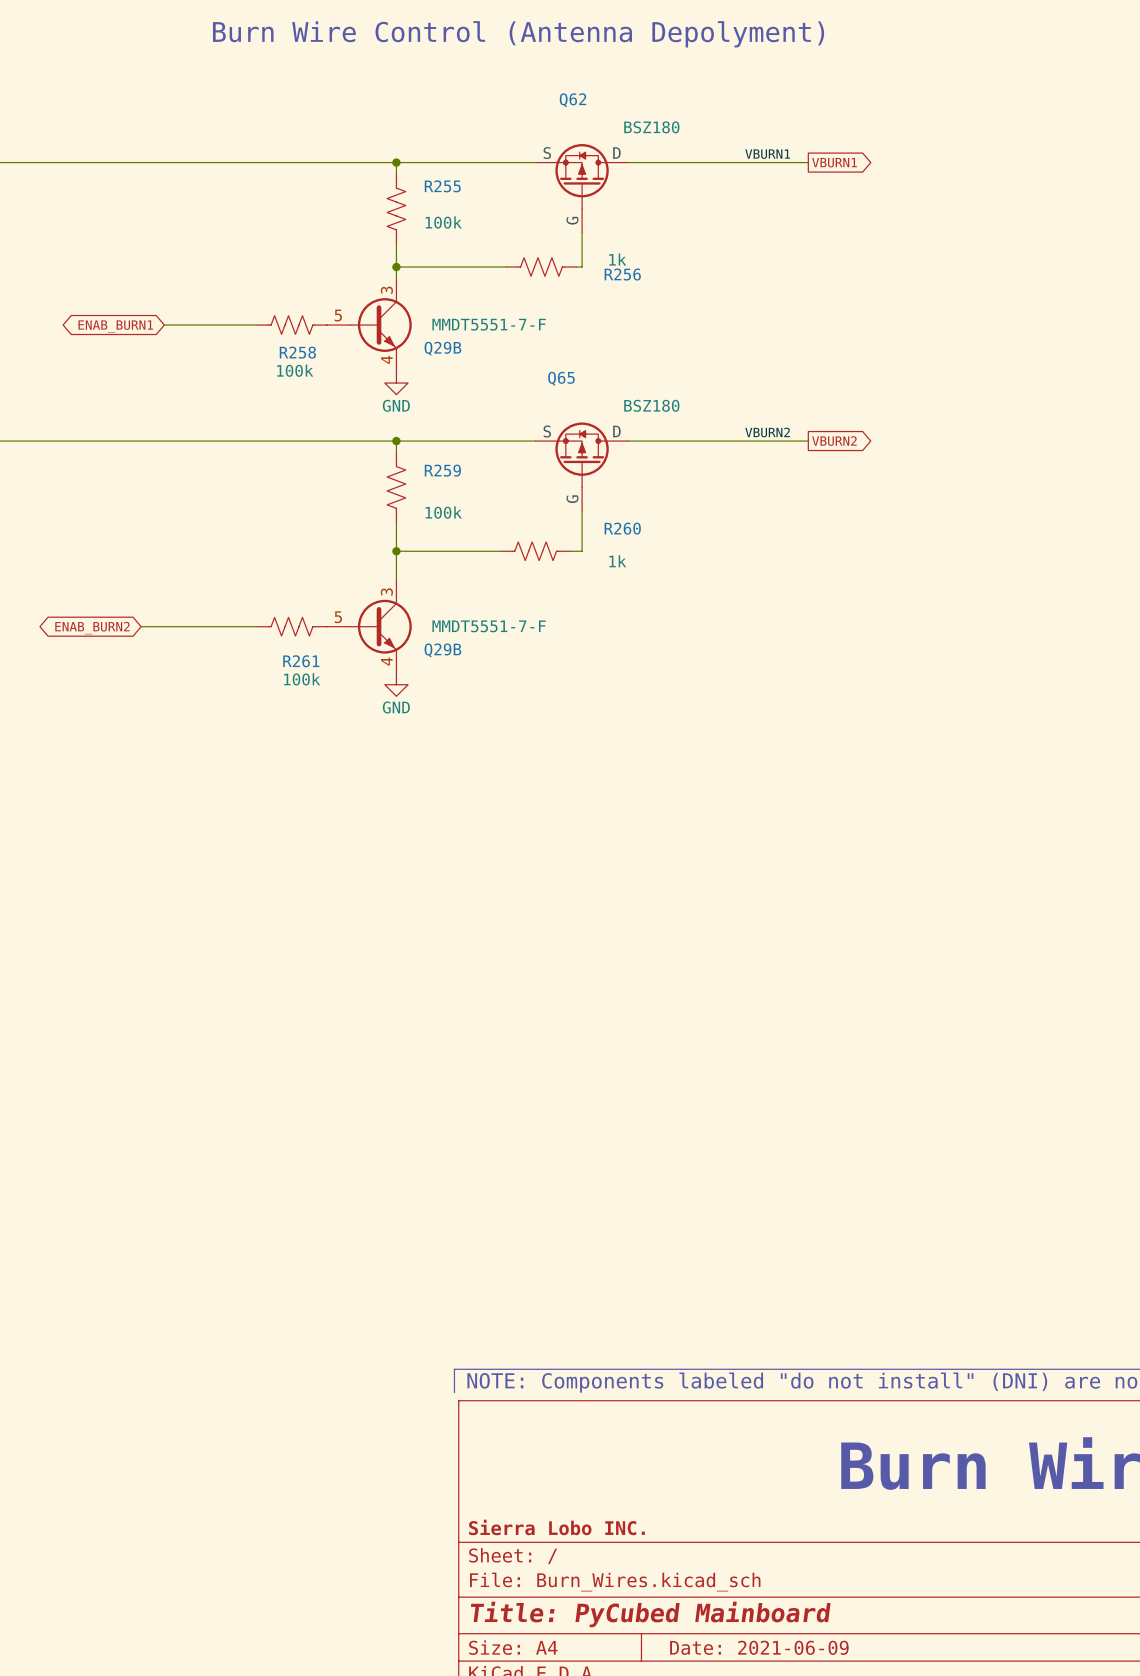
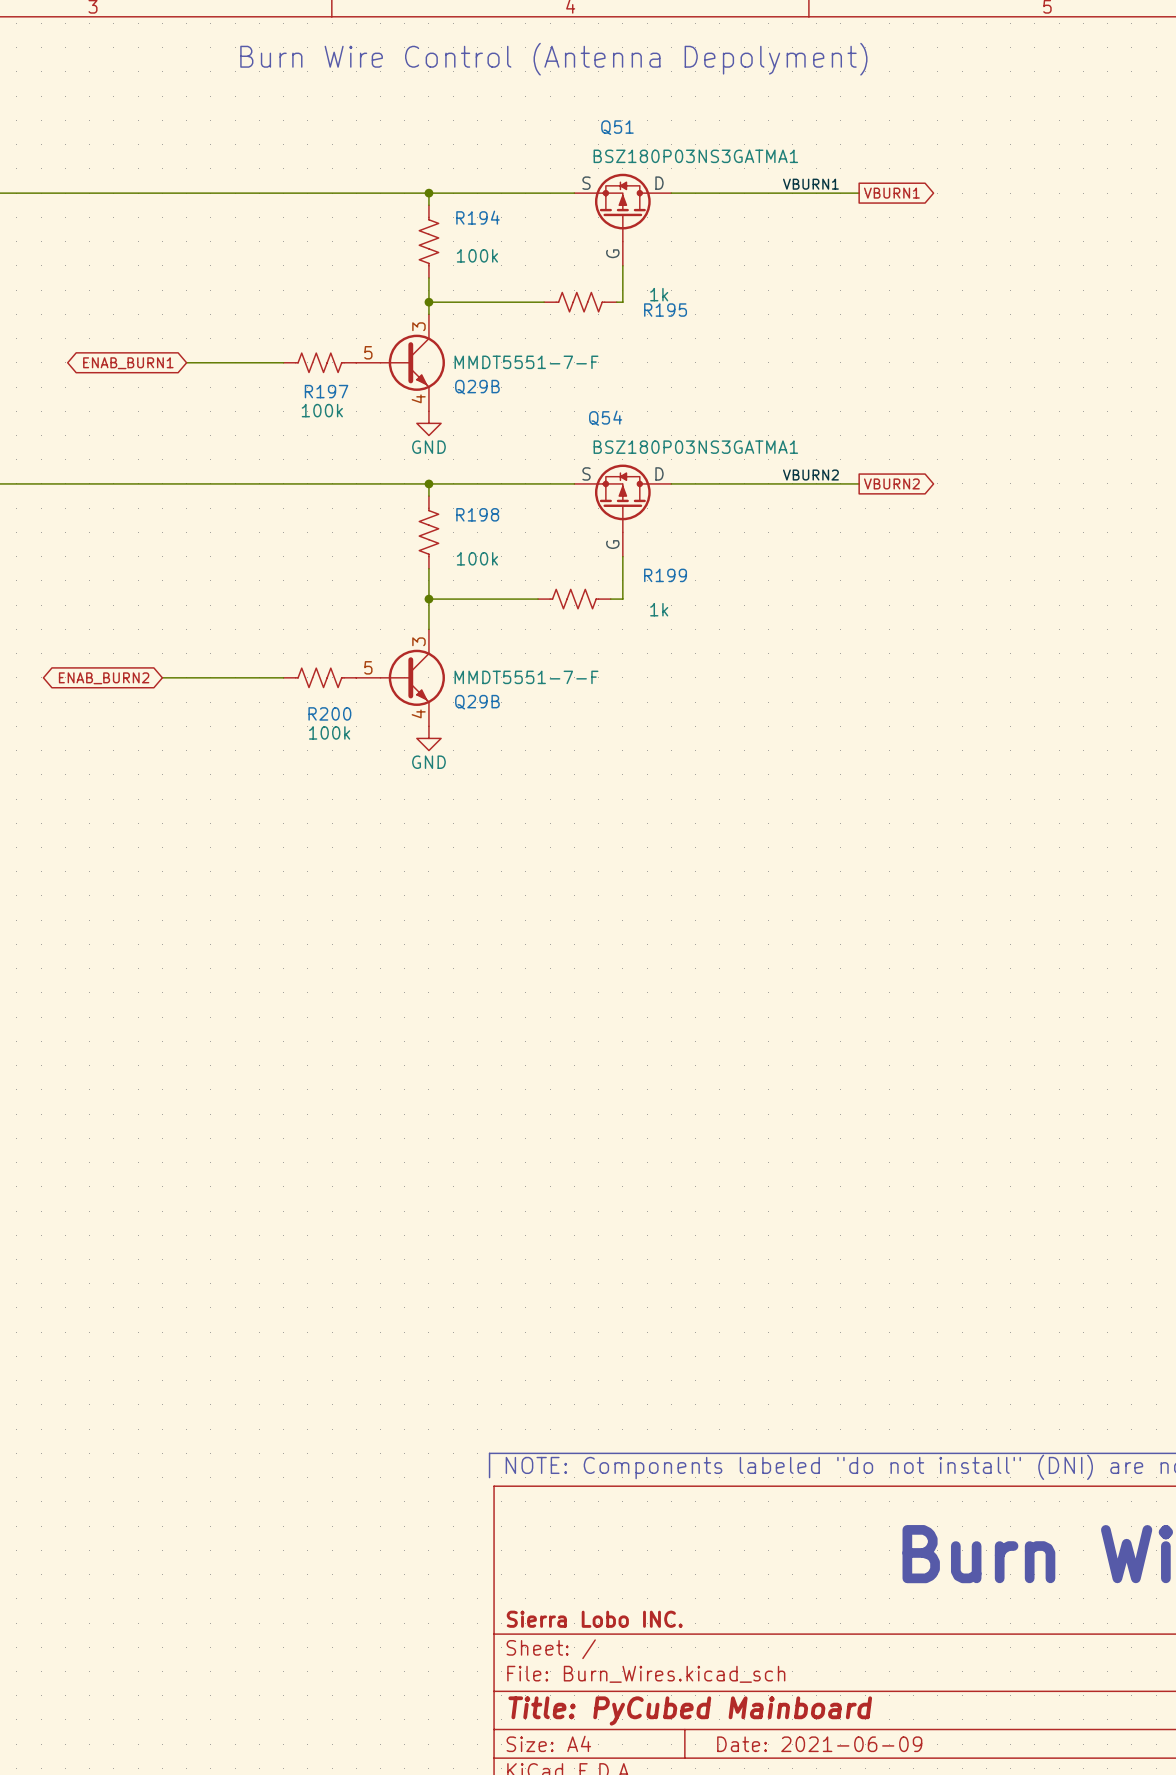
Q62 name: Q62 (573, 100) -> Q51 (617, 127)
Q62 value: BSZ180 (651, 127) -> BSZ180P03NS3GATMA1 (695, 156)
R255 name: R255 (442, 186) -> R194 (478, 217)
R256 name: R256 (622, 274) -> R195 (665, 310)
R258 name: R258 (297, 352) -> R197 (326, 391)
Q65 name: Q65 (561, 378) -> Q54 (605, 418)
Q65 value: BSZ180 (651, 405) -> BSZ180P03NS3GATMA1 (695, 447)
R259 name: R259 (442, 470) -> R198 (477, 514)
R260 name: R260 (622, 528) -> R199 (665, 575)
R261 name: R261 (301, 661) -> R200 (329, 713)

